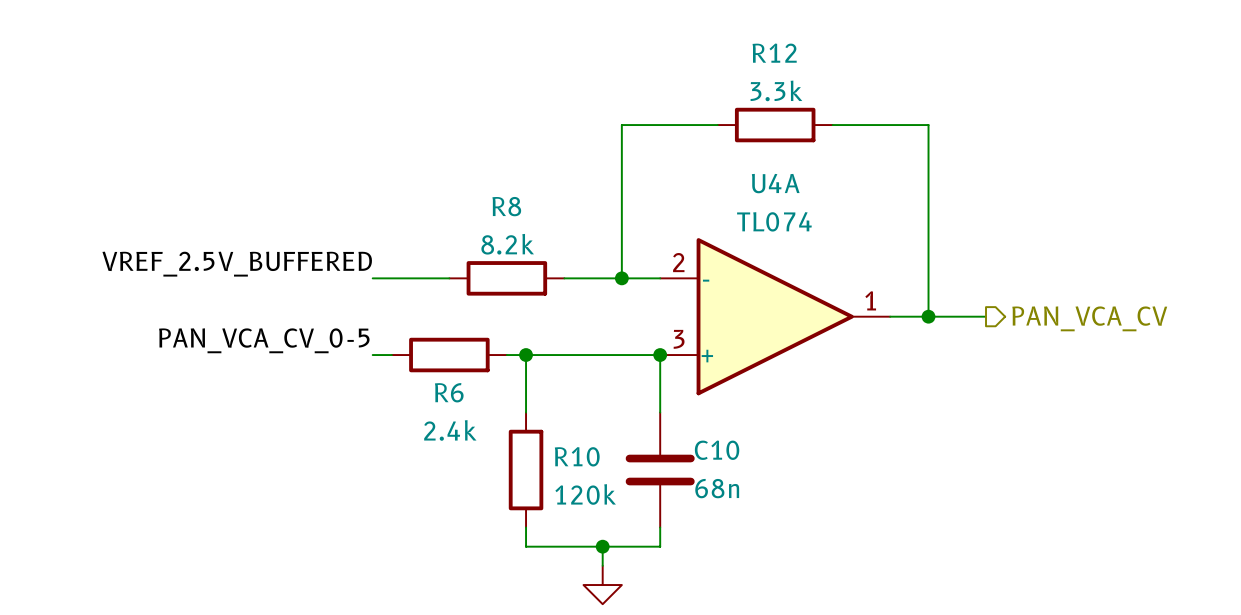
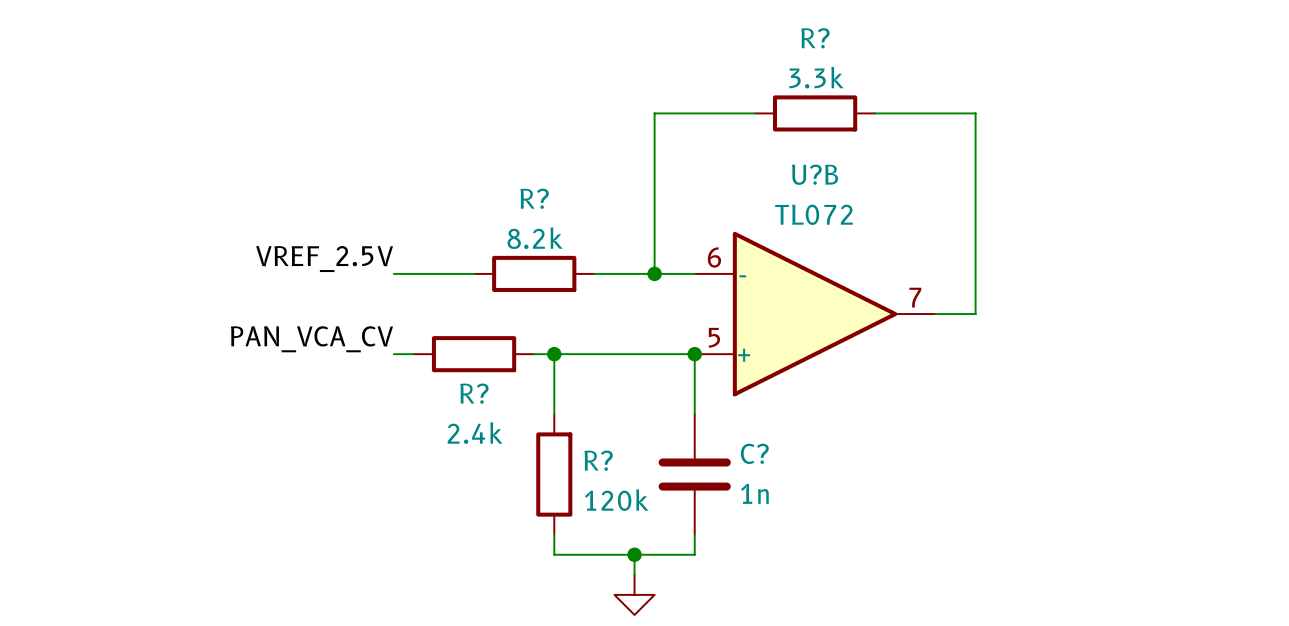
R12 name: R12 (774, 53) -> R? (815, 38)
U4A name: U4A (775, 183) -> U?B (815, 174)
R8 name: R8 (506, 206) -> R? (534, 198)
U4A value: TL074 (774, 221) -> TL072 (814, 214)
U4A pin number: 2 (678, 262) -> 6 (714, 257)
label: VREF_2.5V_BUFFERED (237, 264) -> VREF_2.5V (324, 259)
U4A pin number: 1 (870, 300) -> 7 (915, 297)
wire: (928, 316) (986, 316) -> none
junction: (928, 316) -> none
hierarchical label: PAN_VCA_CV (1089, 318) -> none
U4A pin number: 3 (679, 339) -> 5 (714, 337)
label: PAN_VCA_CV_0-5 (264, 340) -> PAN_VCA_CV (311, 339)
R6 name: R6 (449, 392) -> R? (474, 393)
C10 name: C10 (717, 450) -> C? (754, 453)
R10 name: R10 (577, 456) -> R? (598, 460)
C10 value: 68n (717, 488) -> 1n (754, 493)

